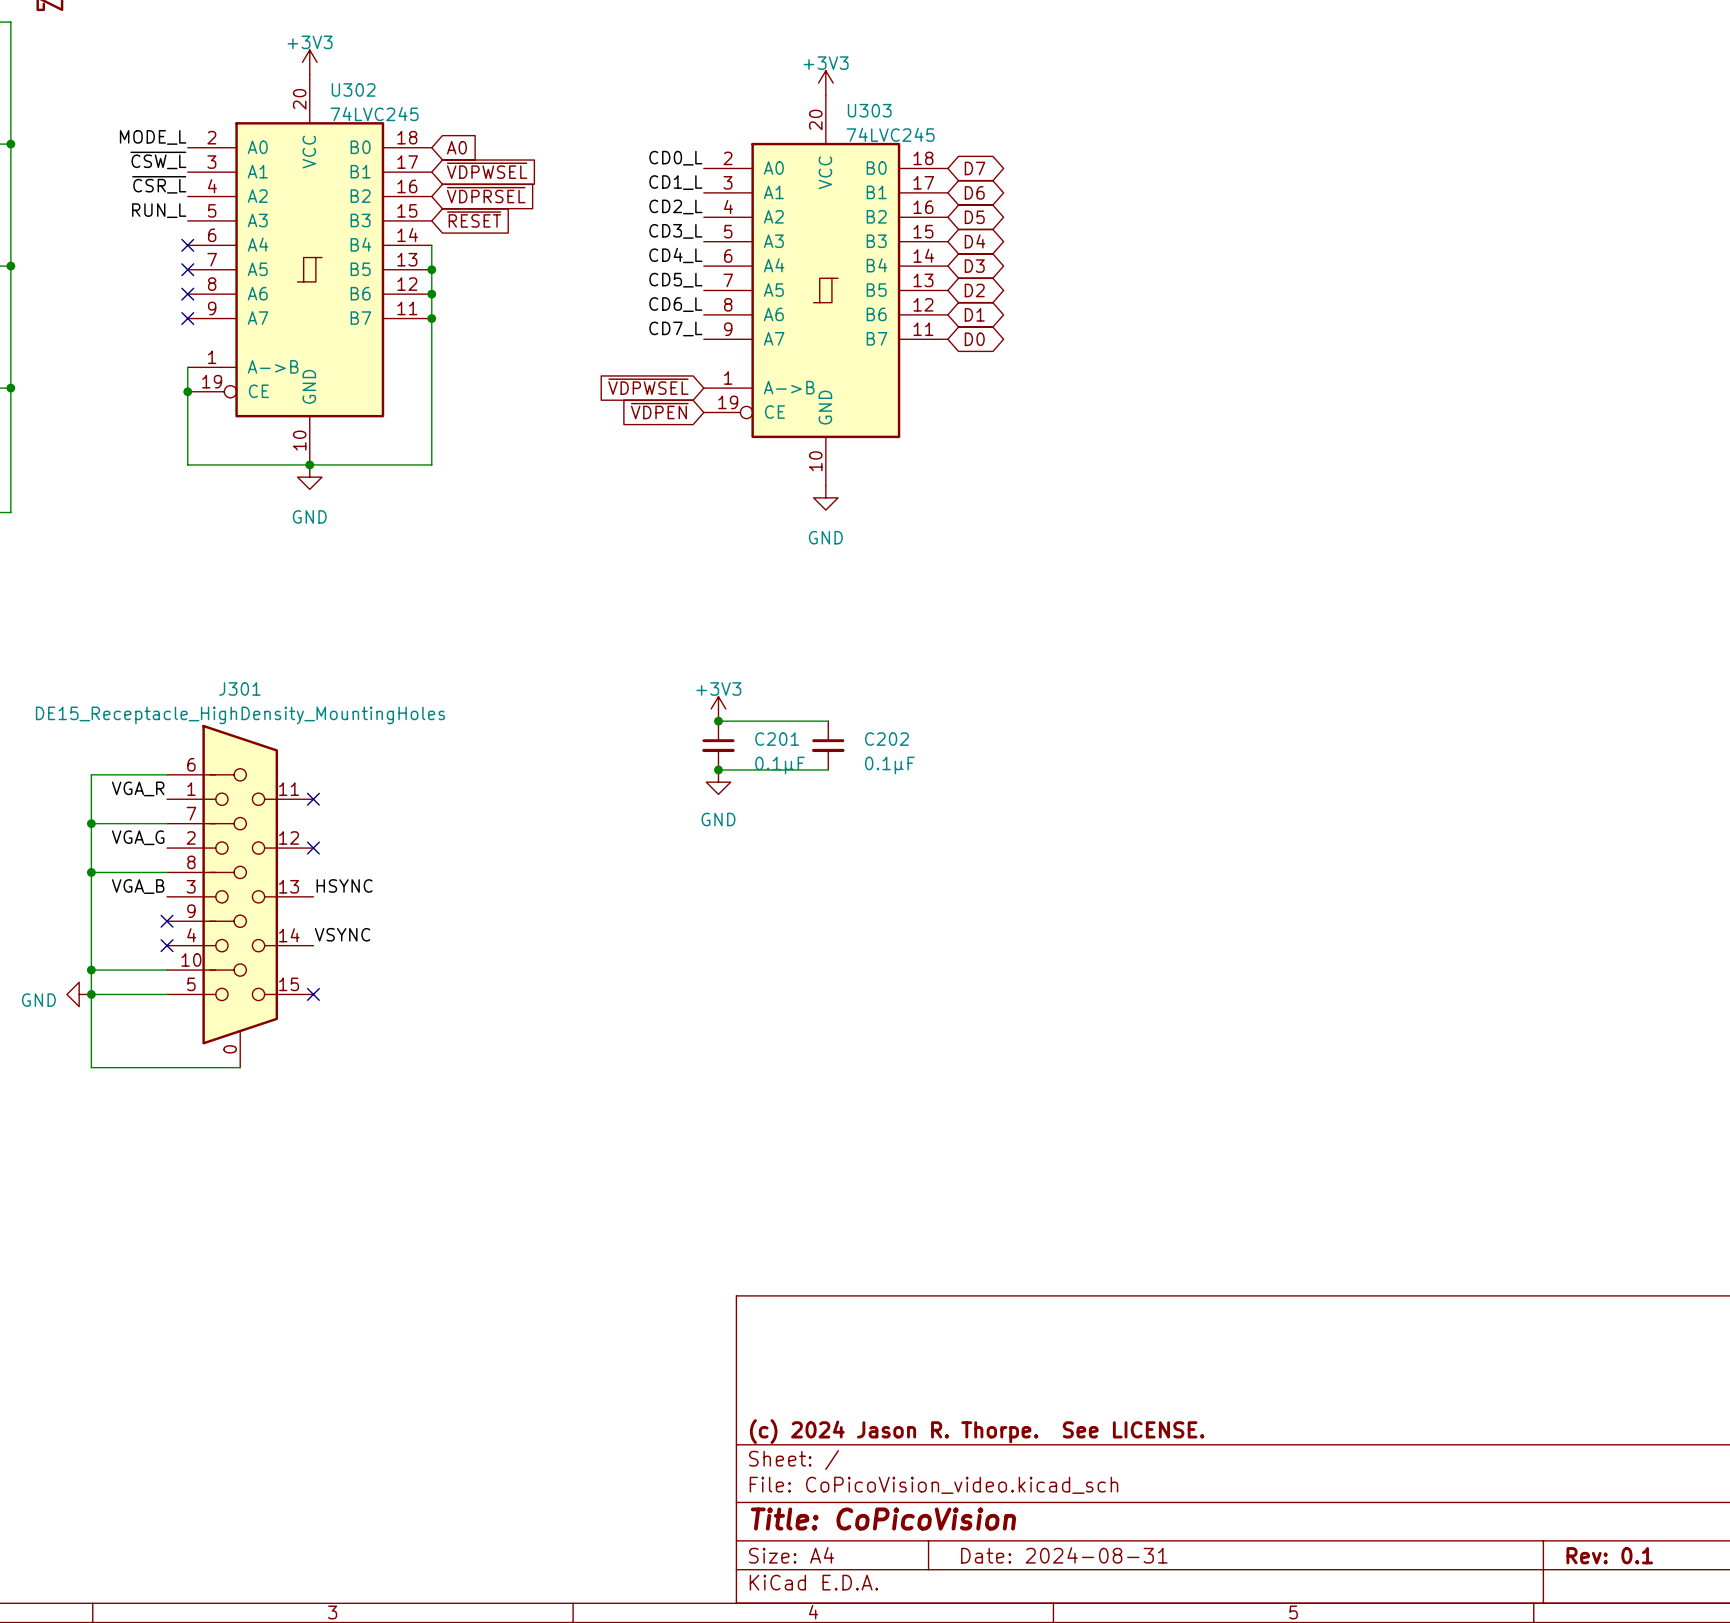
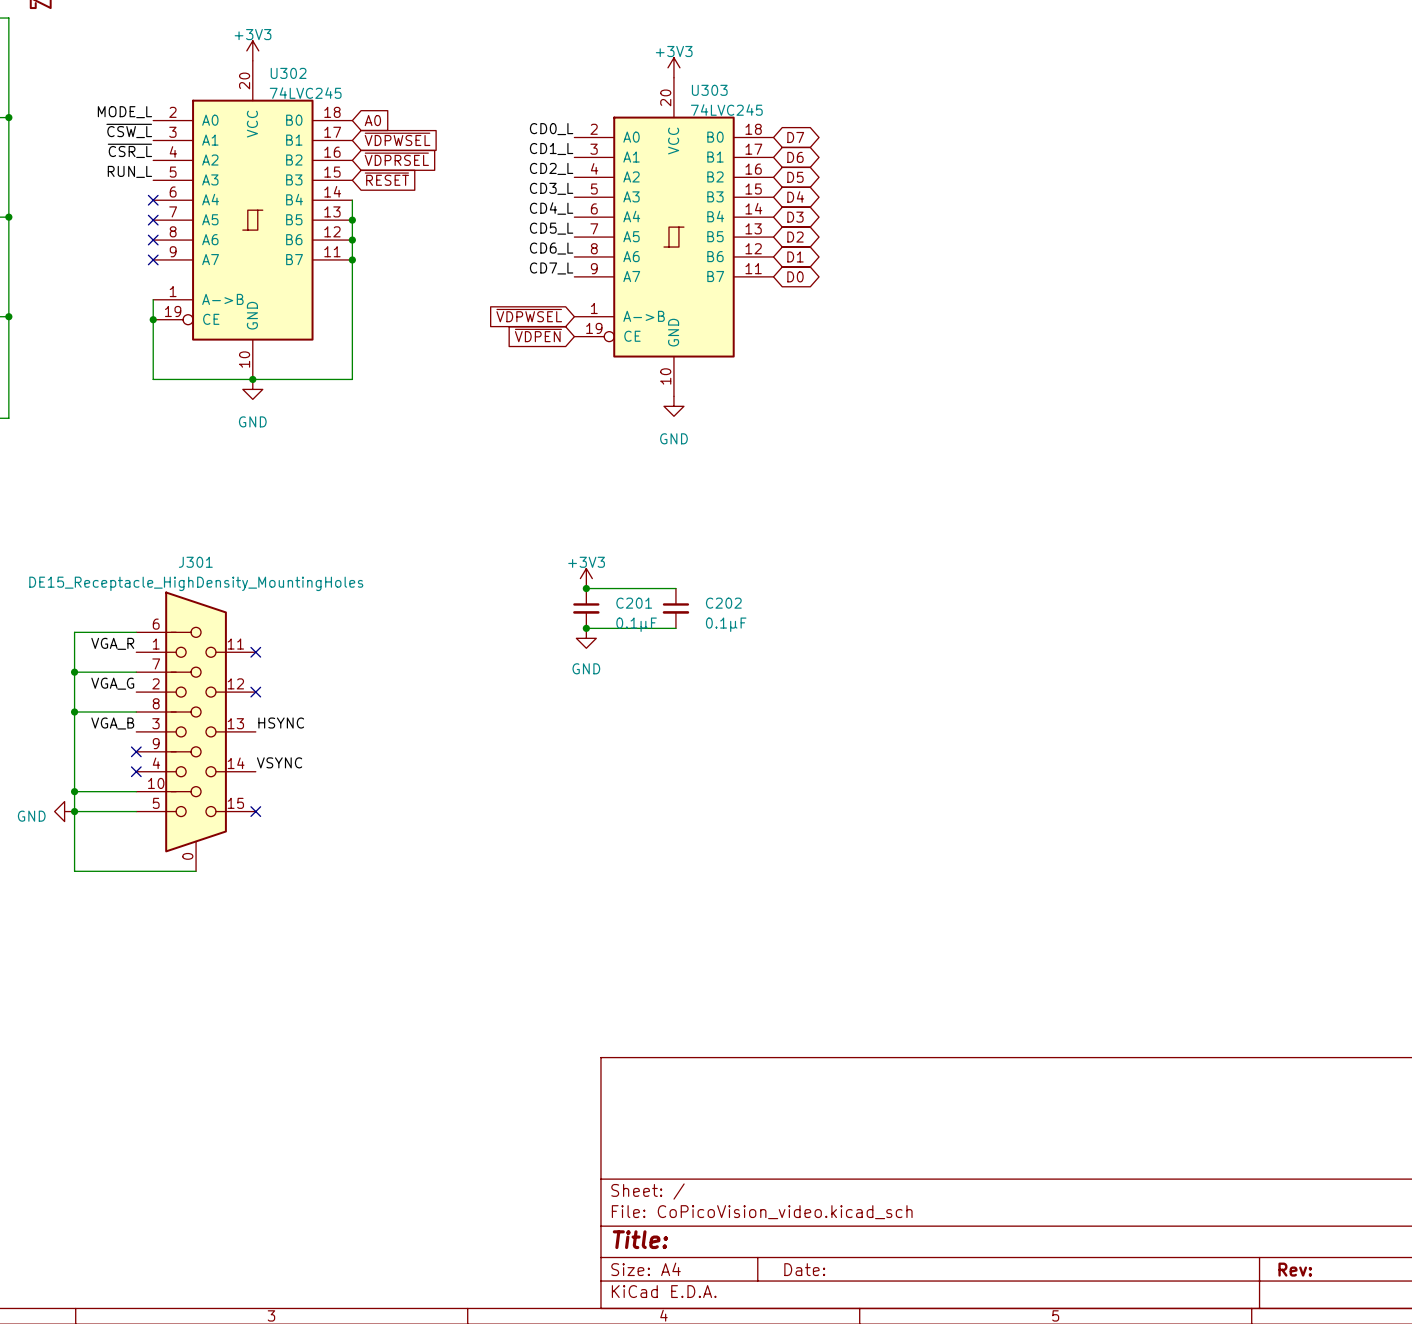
title block: (c) 2024 Jason R. Thorpe. See LICENSE. (977, 1431) -> none
title block: Title: CoPicoVision (883, 1519) -> Title: (640, 1239)
title block: Date: 2024-08-31 (1064, 1555) -> Date: (804, 1269)
title block: Rev: 0.1 (1609, 1555) -> Rev: (1295, 1269)

